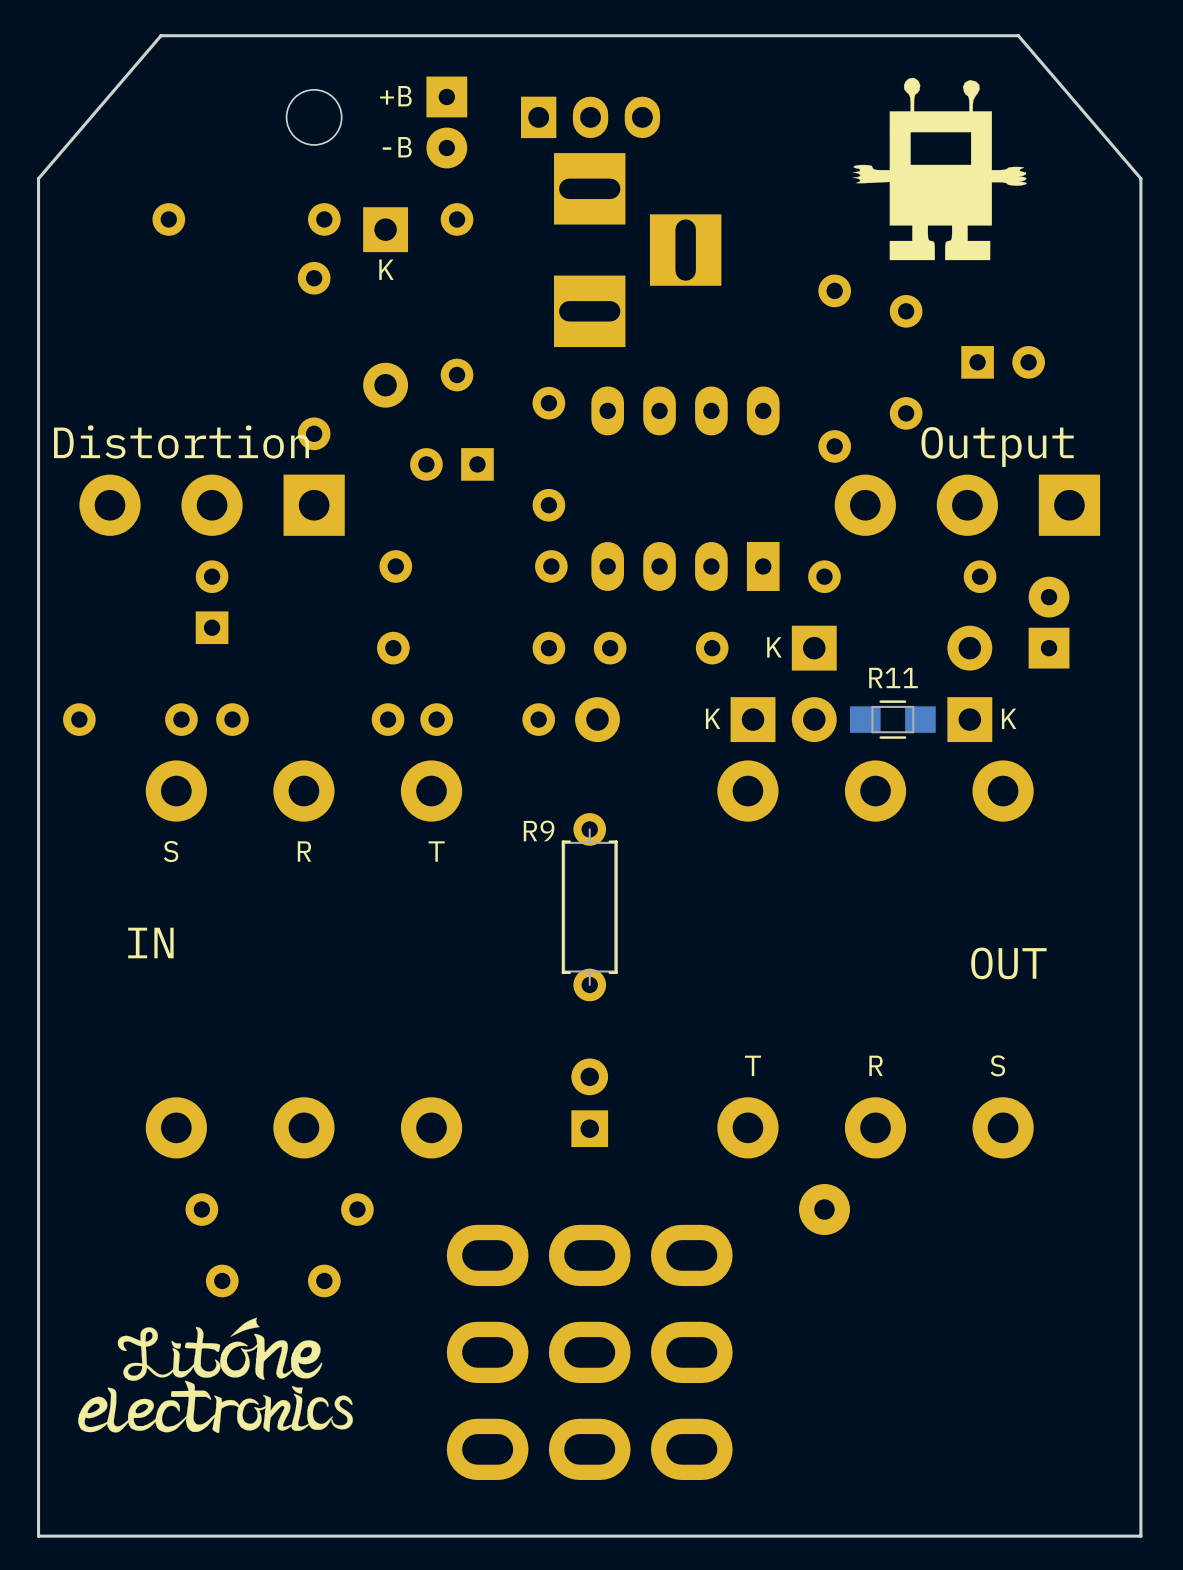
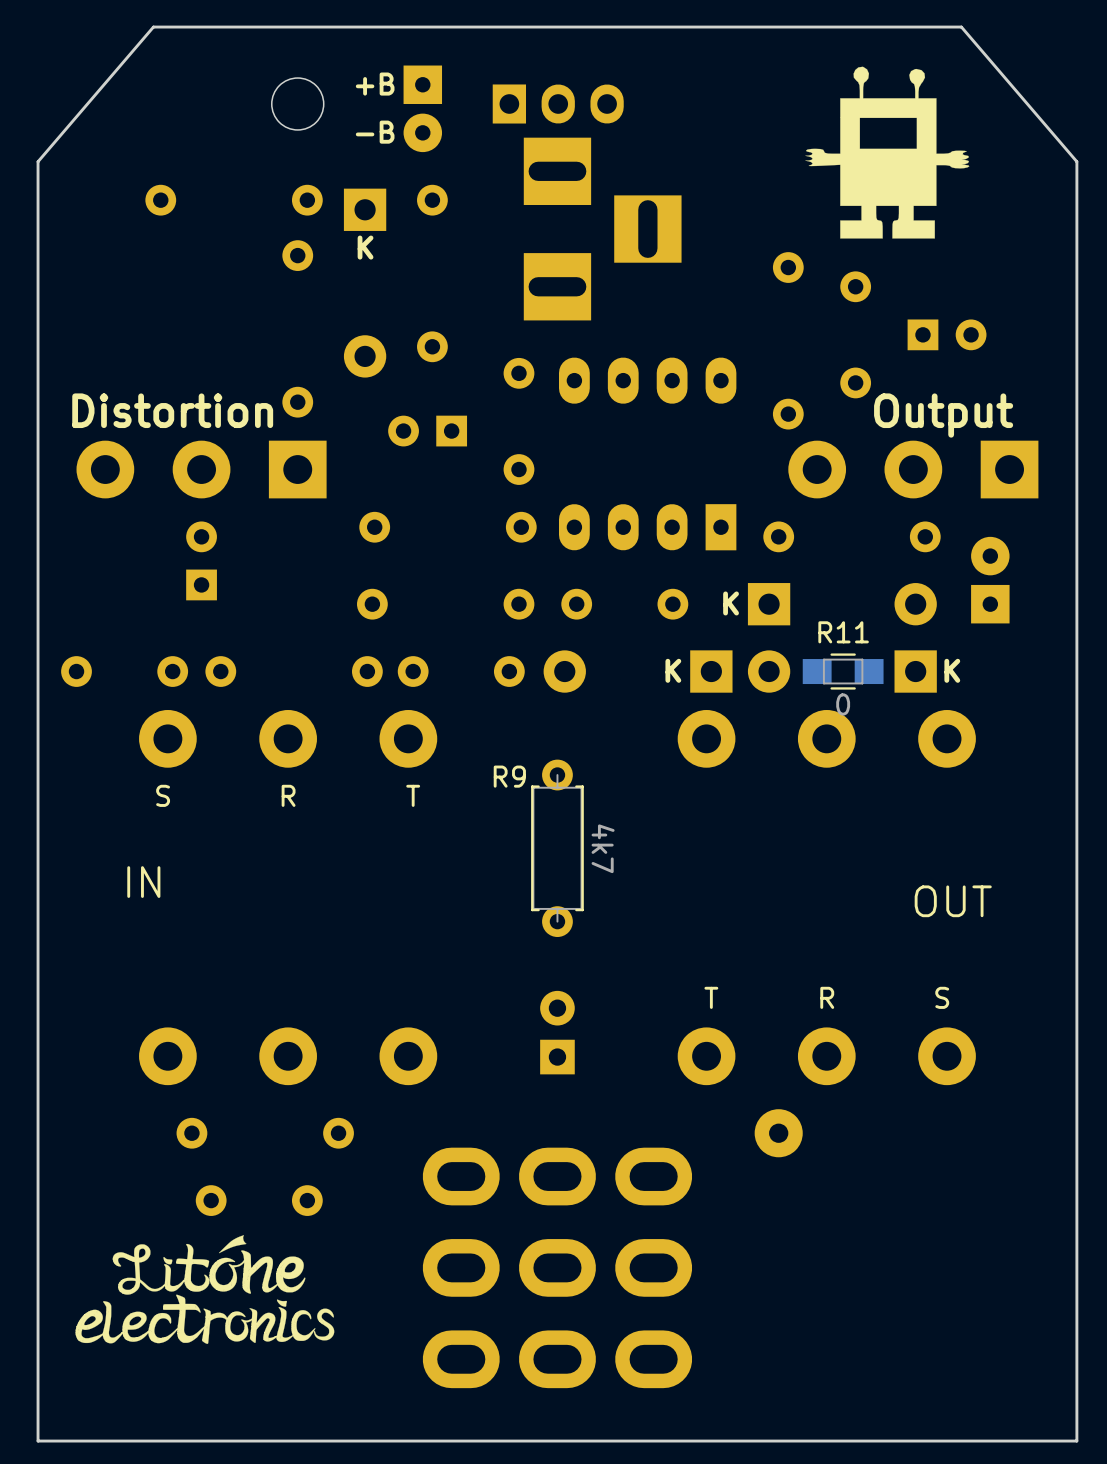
R11 value: none -> 0 (843, 704)
R9 value: none -> 4k7 (603, 848)

